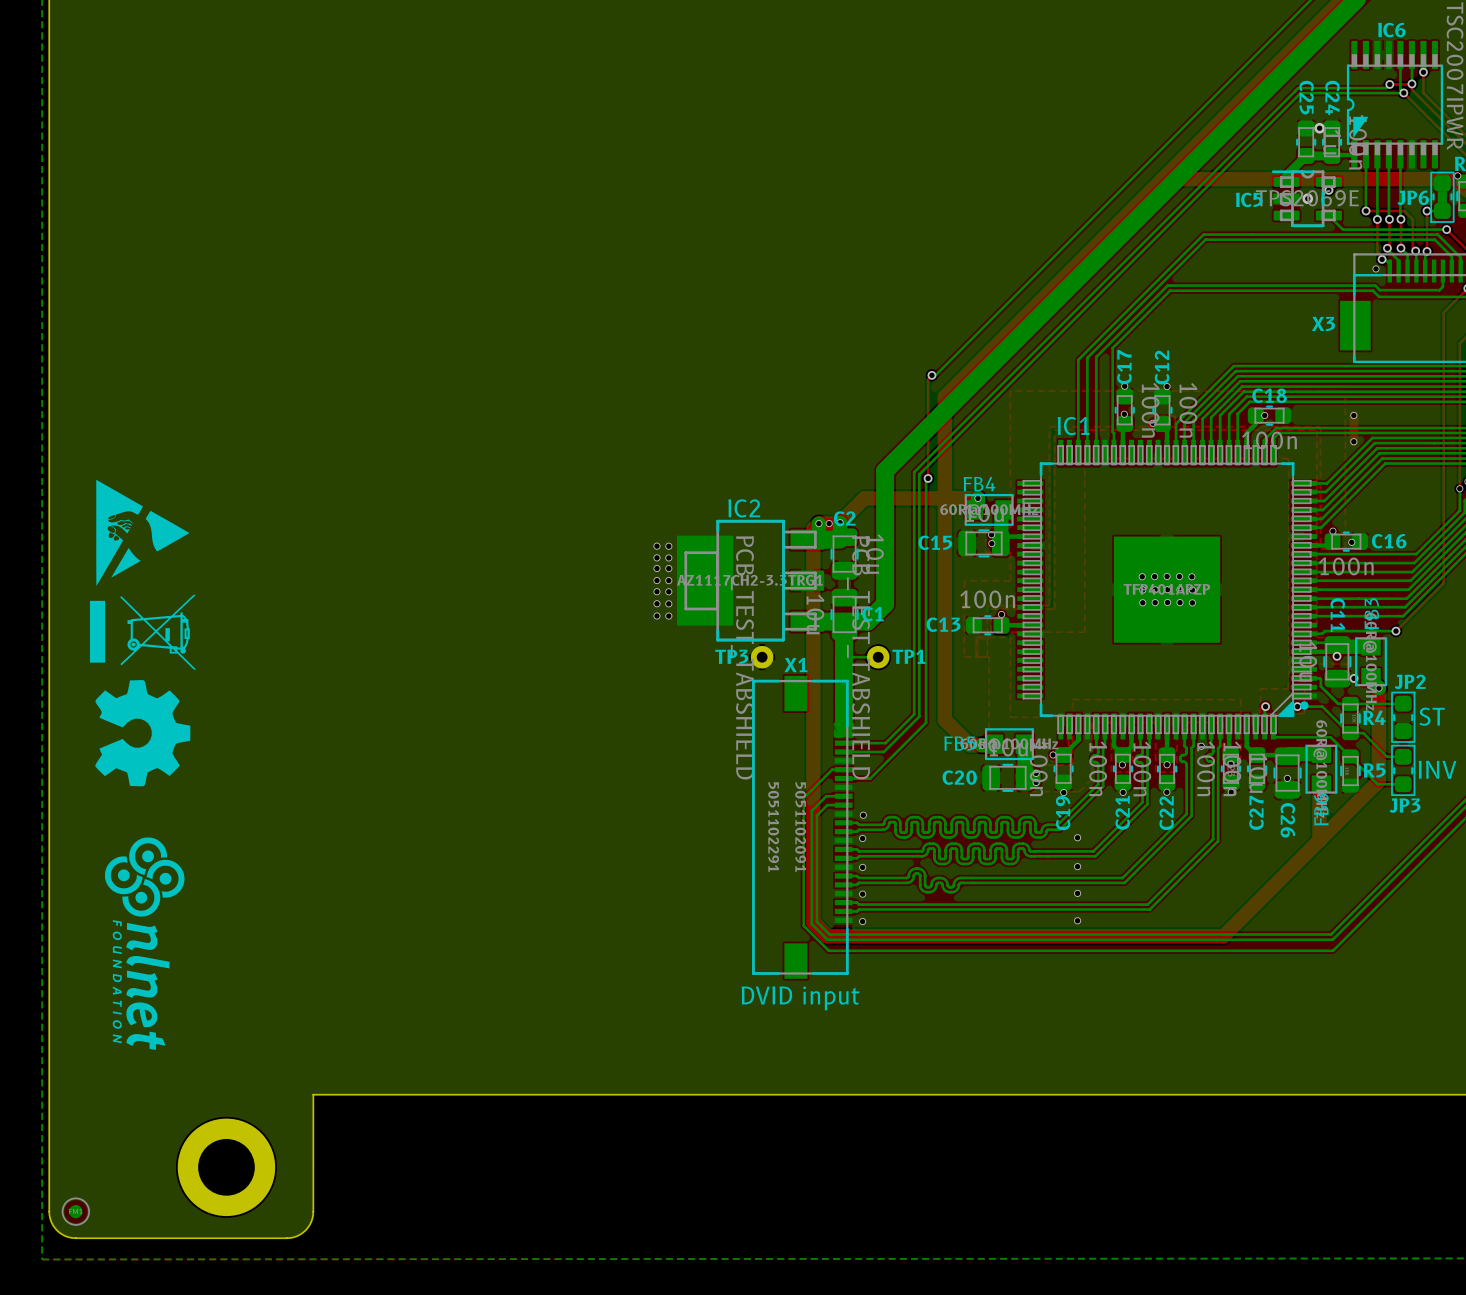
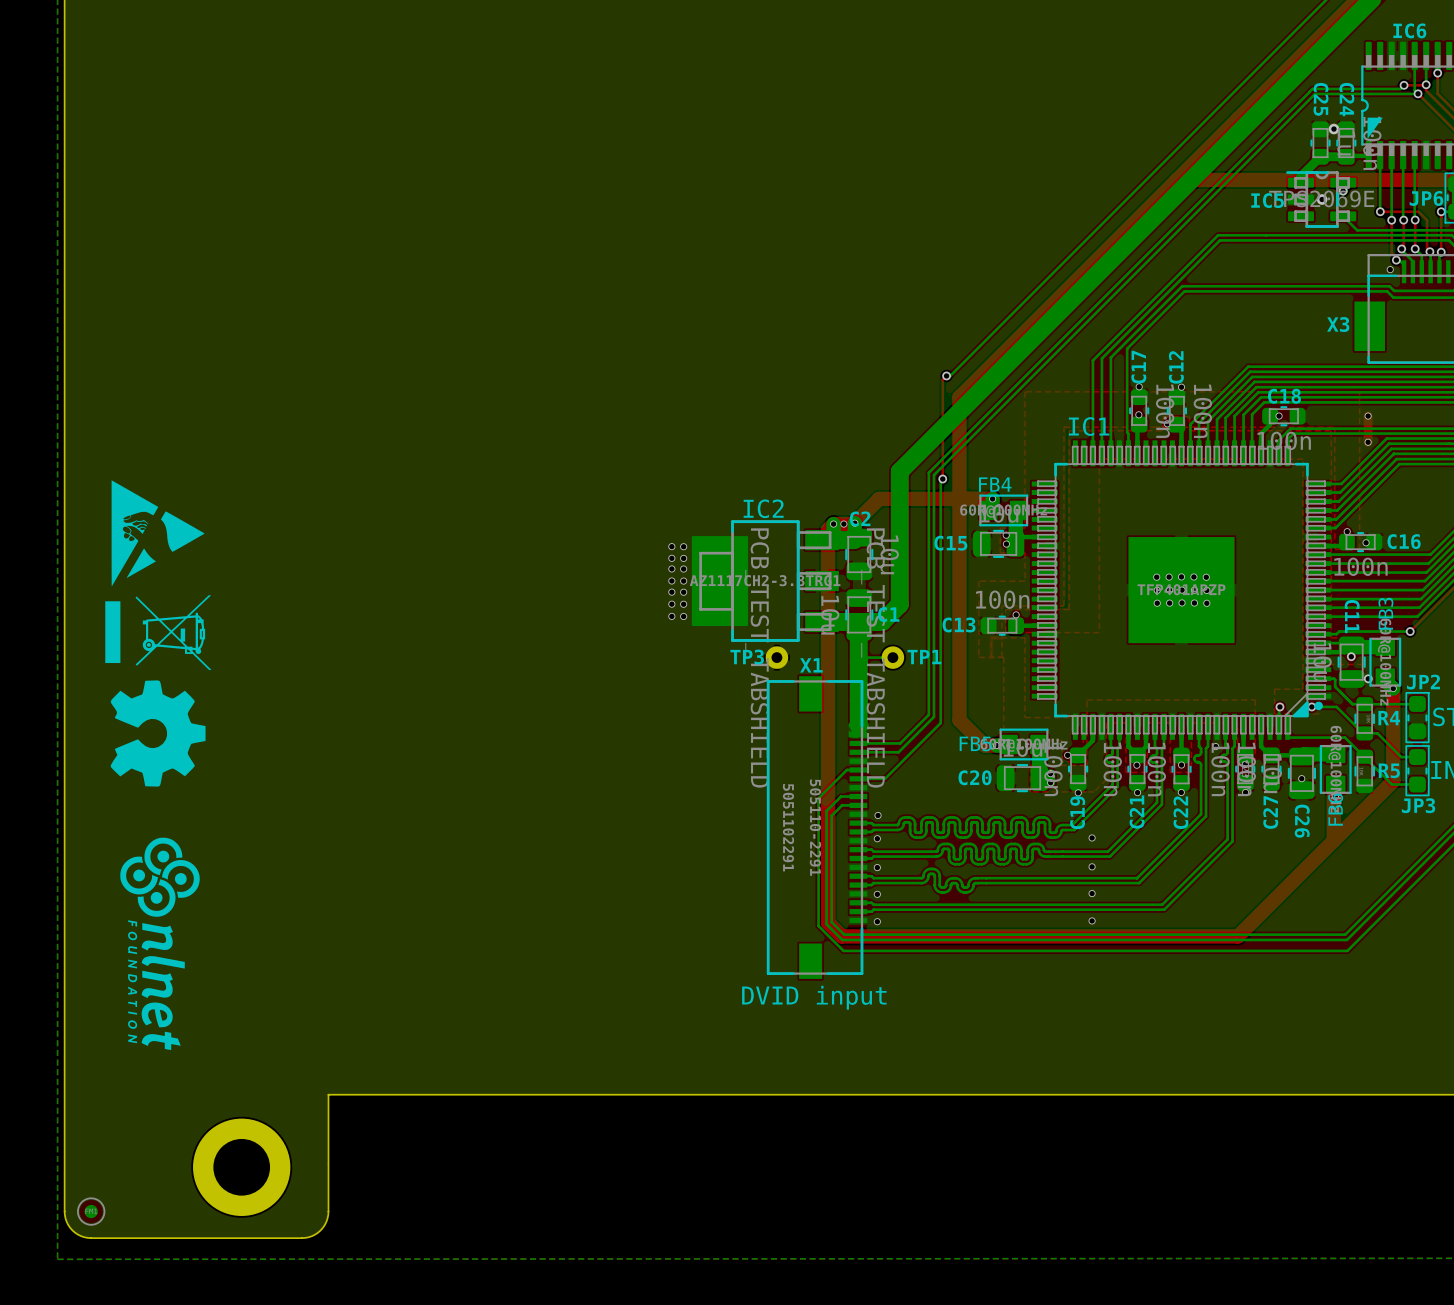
X1 value: 5051102091 (800, 827) -> 505110-2291 (815, 827)

